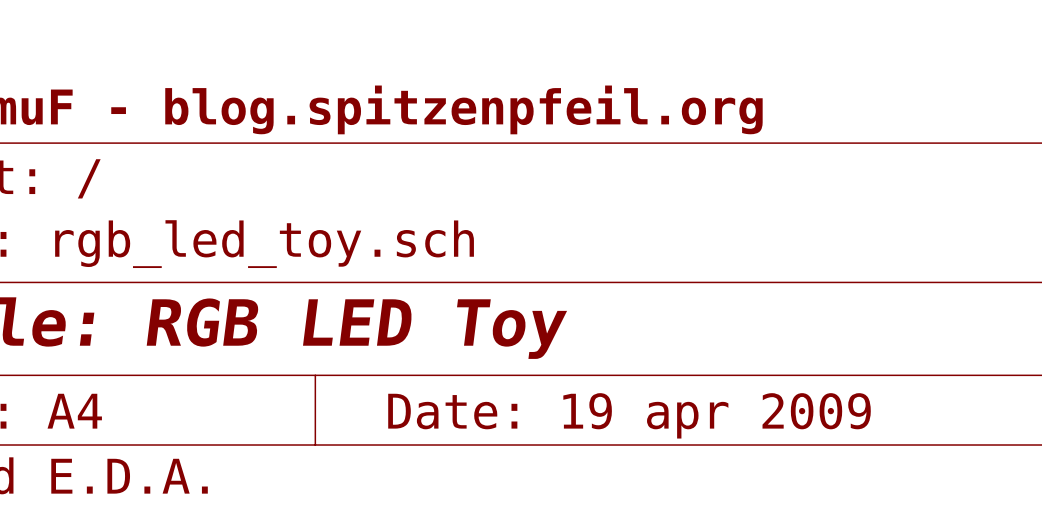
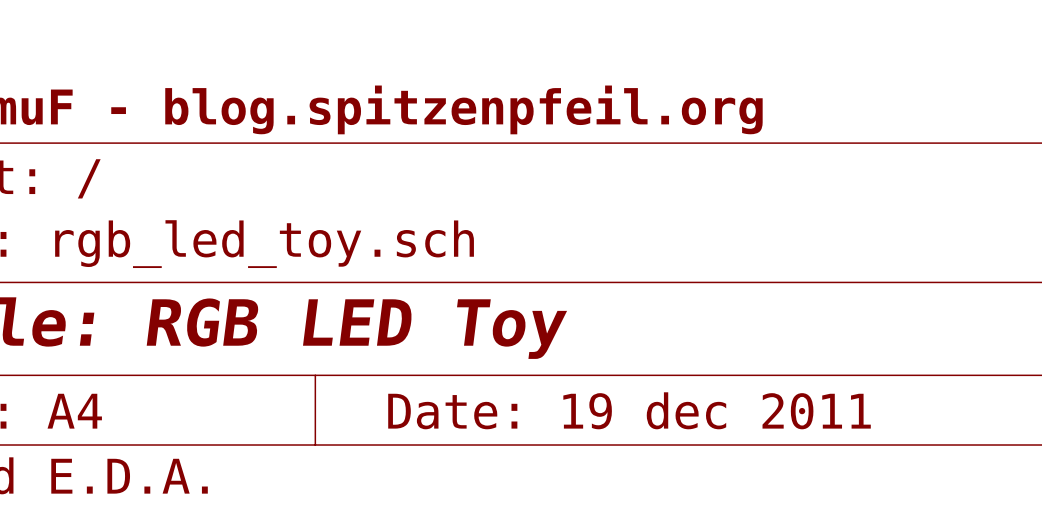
title block: Date: 19 apr 2009 (629, 415) -> Date: 19 dec 2011 (629, 410)

